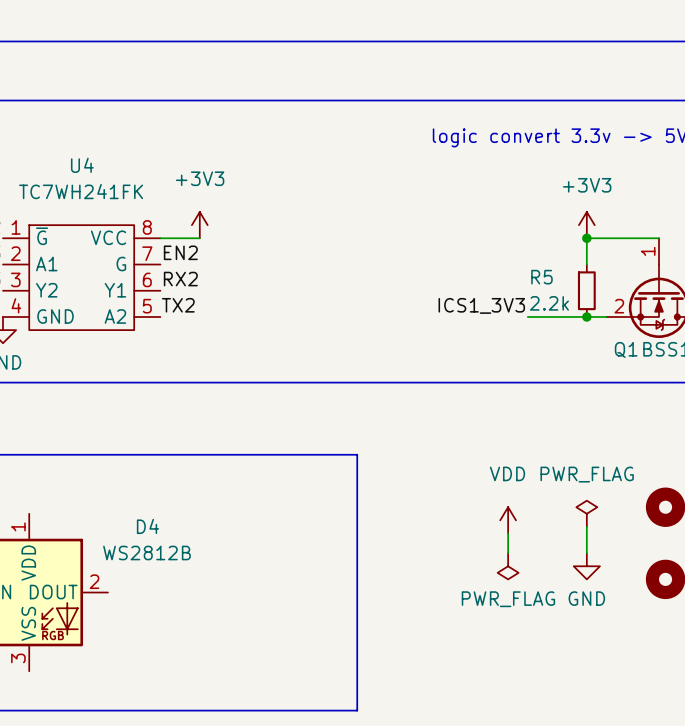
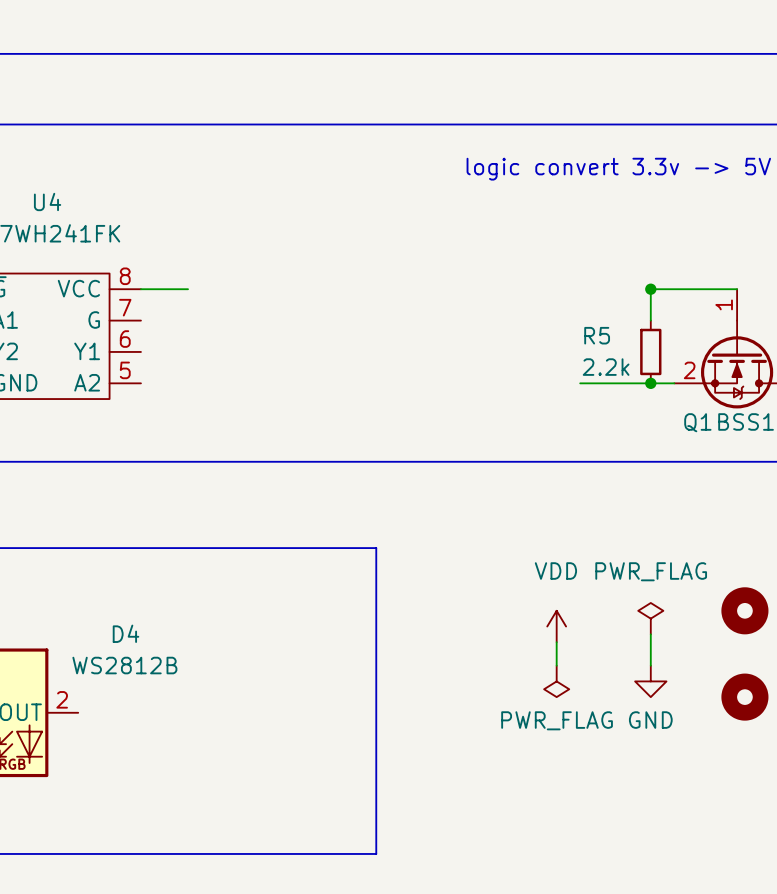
power symbol: +3V3 (199, 225) -> none
power symbol: +3V3 (586, 225) -> none
label: EN2 (180, 252) -> none
label: RX2 (180, 279) -> none
label: TX2 (178, 305) -> none
label: ICS1_3V3 (481, 305) -> none

